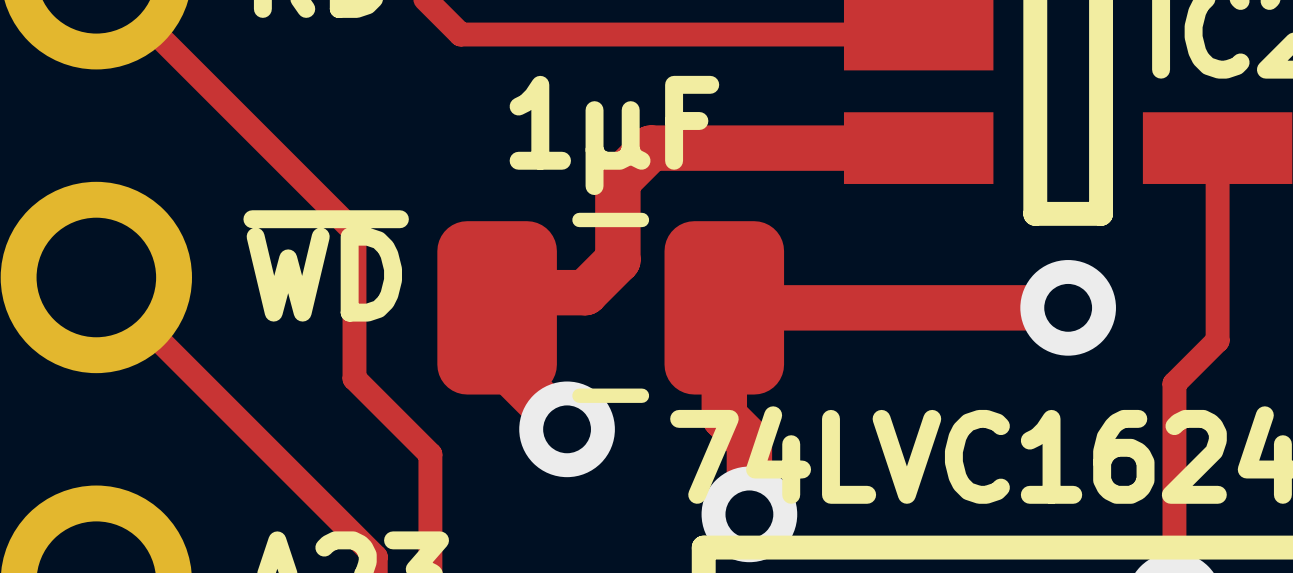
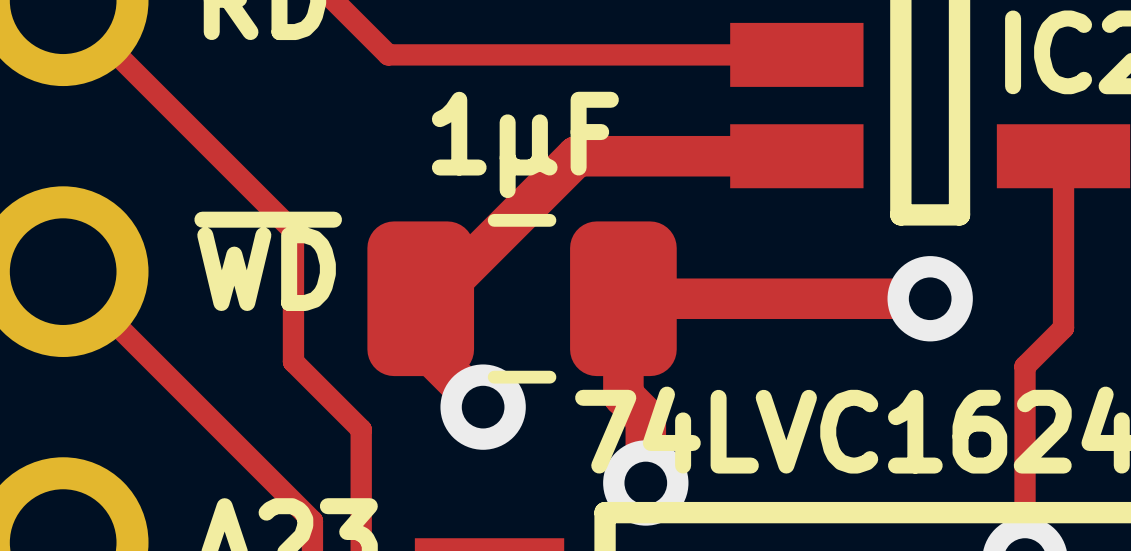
track: (672, 148) (650, 148) (617, 181) (617, 260) (585, 292) (527, 292) -> (576, 156) (447, 285)

